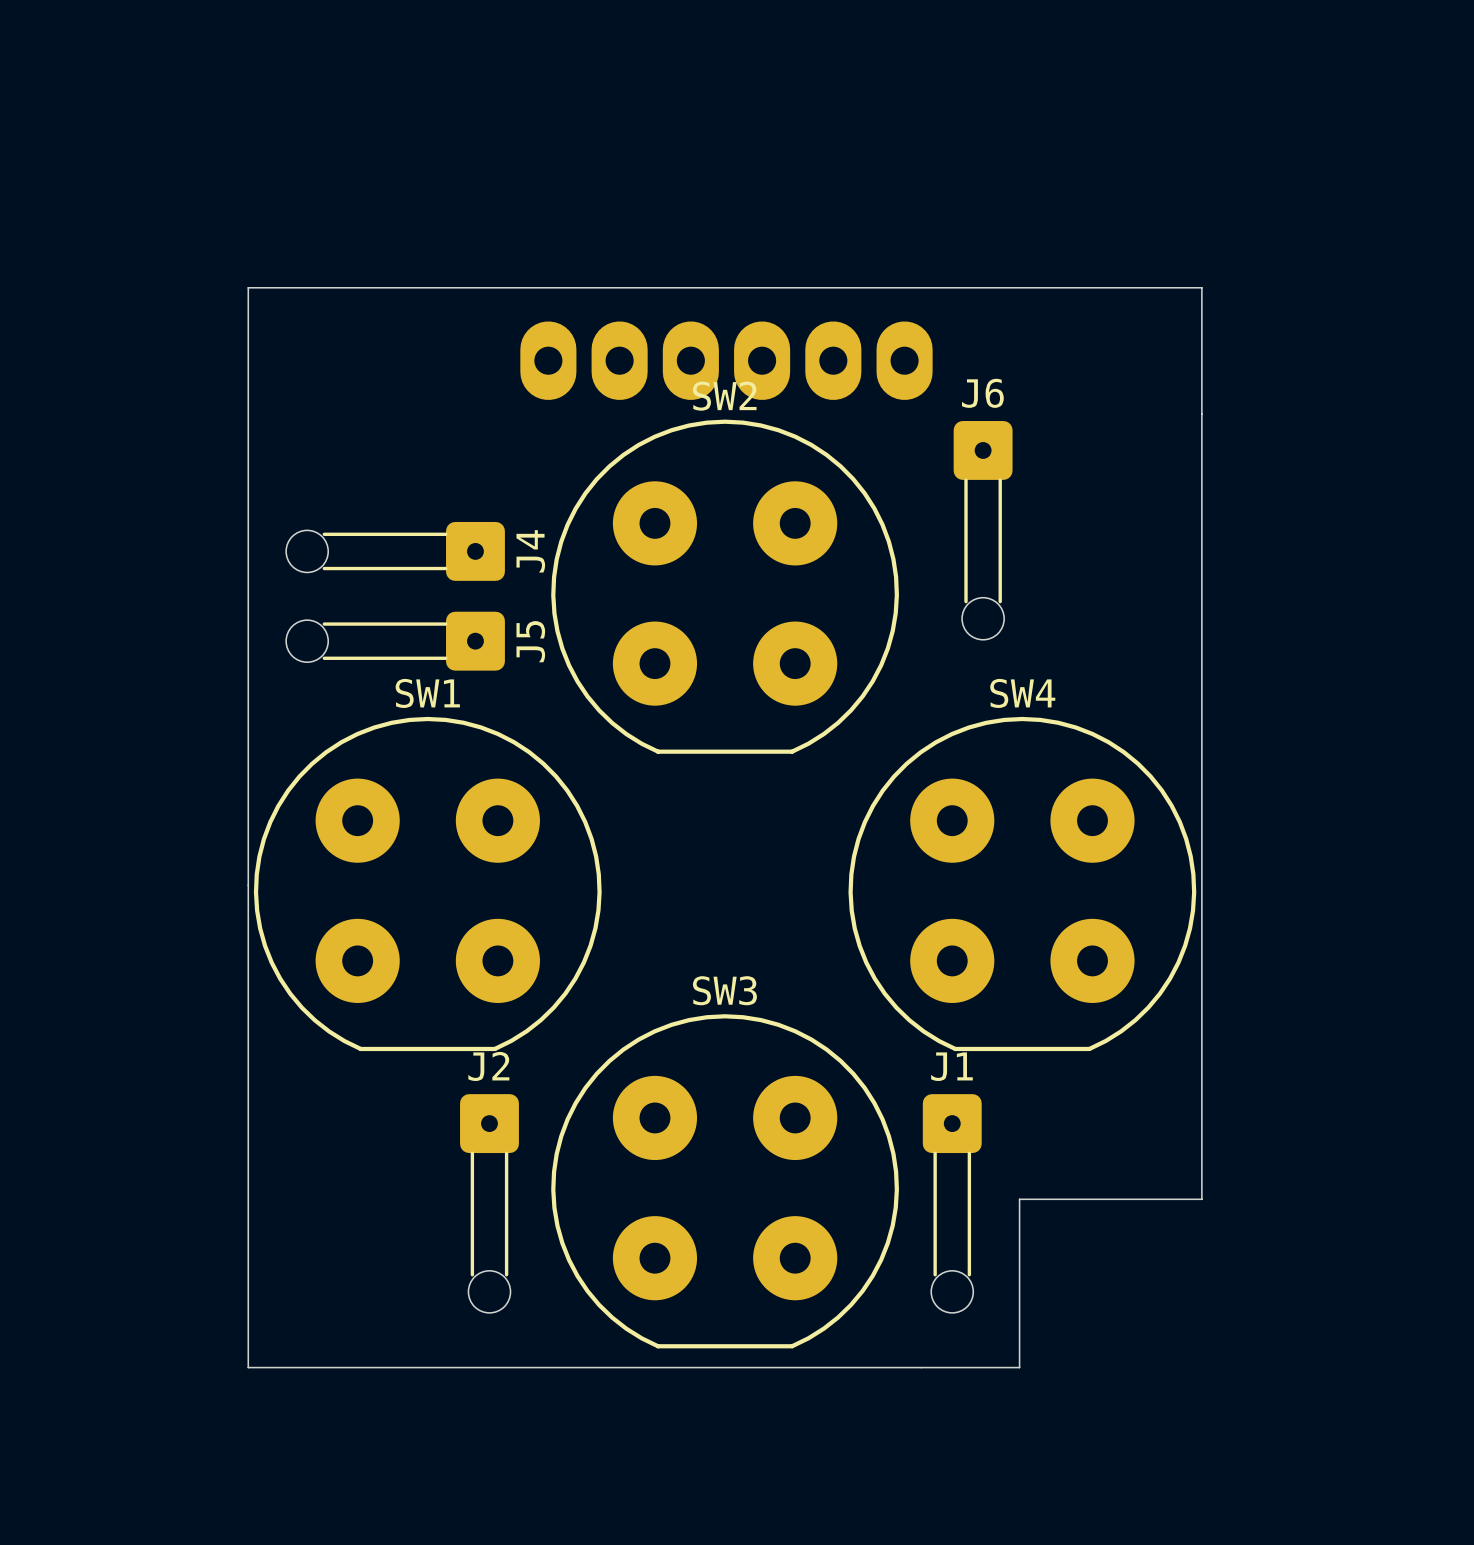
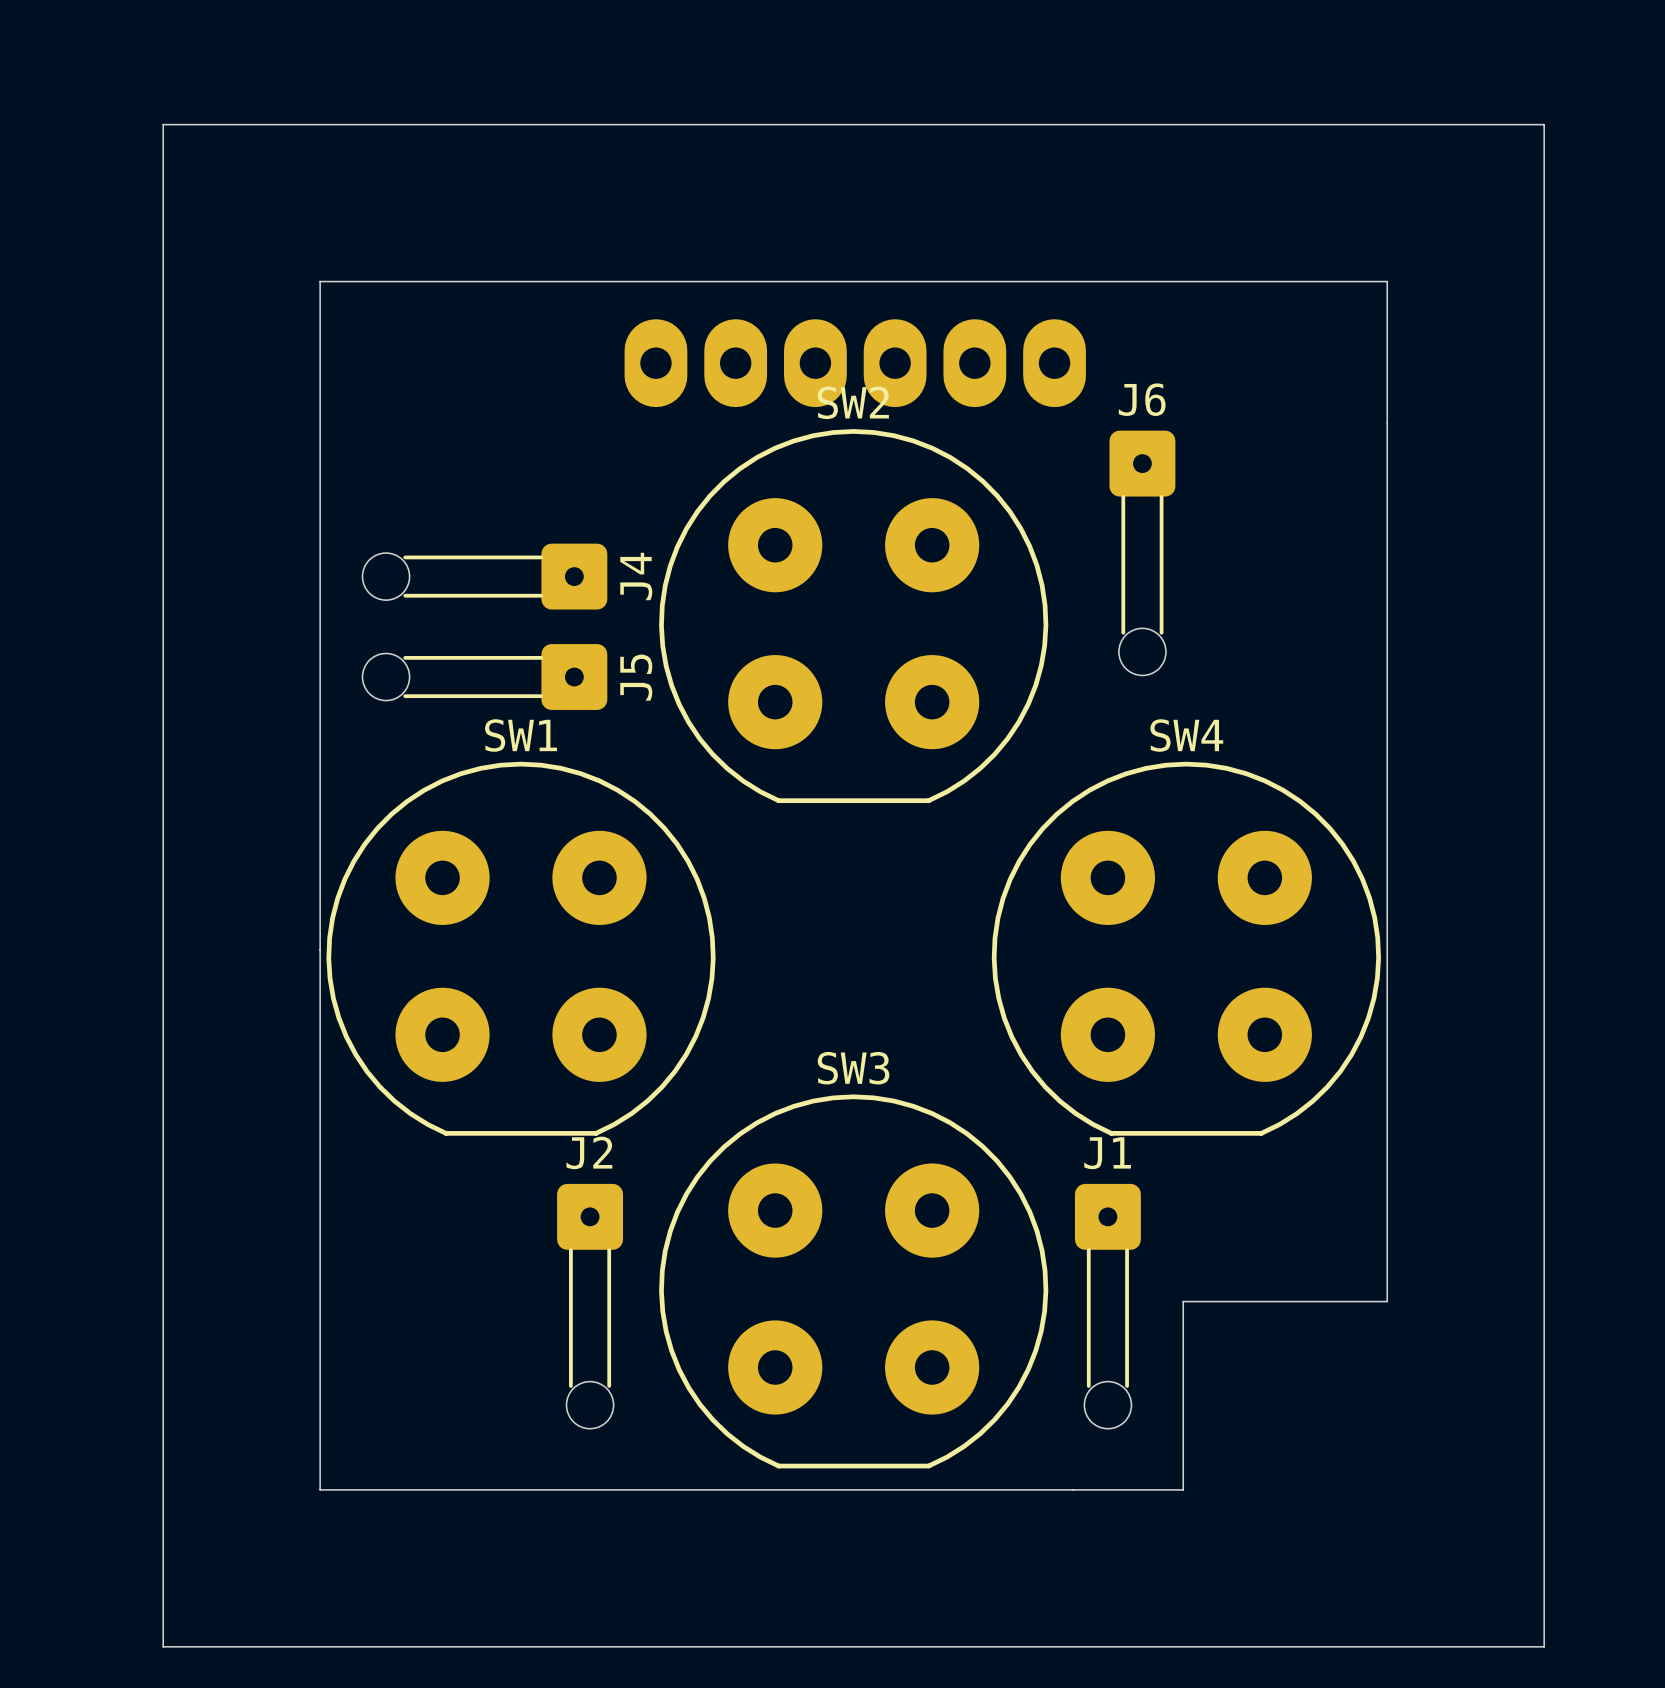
board edge: none -> (163, 124) (1544, 124) (1544, 1646) (163, 1646) (163, 124)

